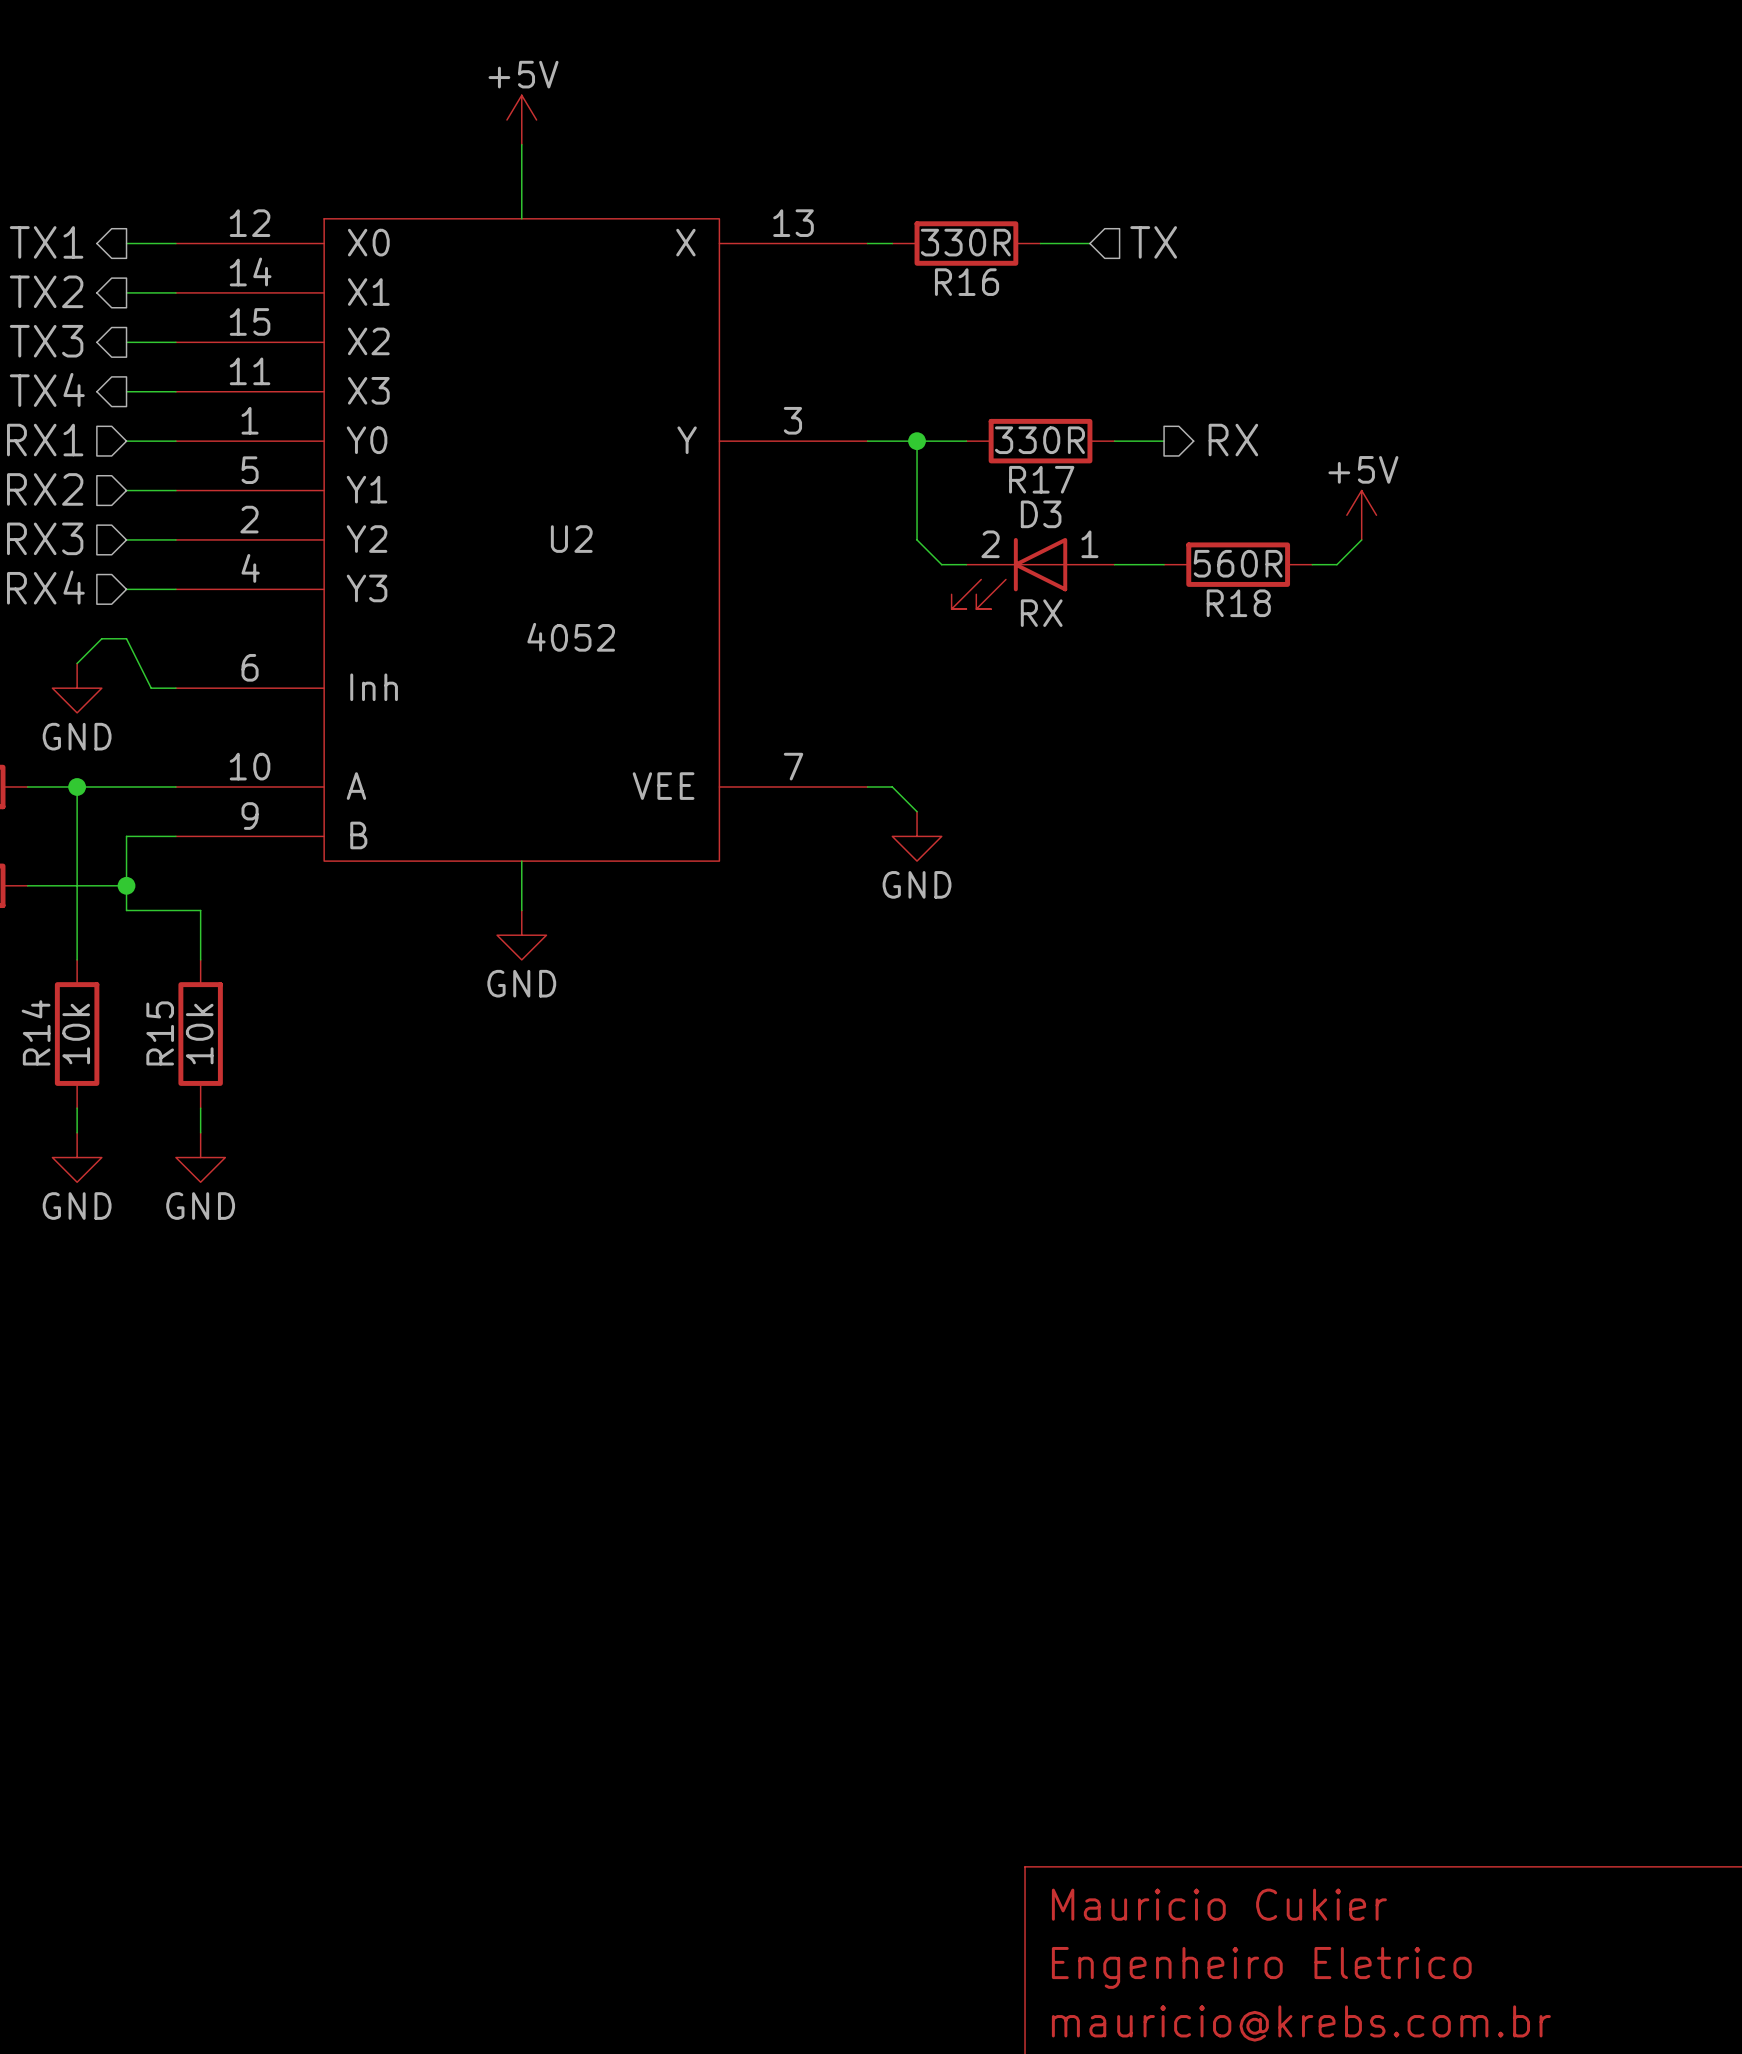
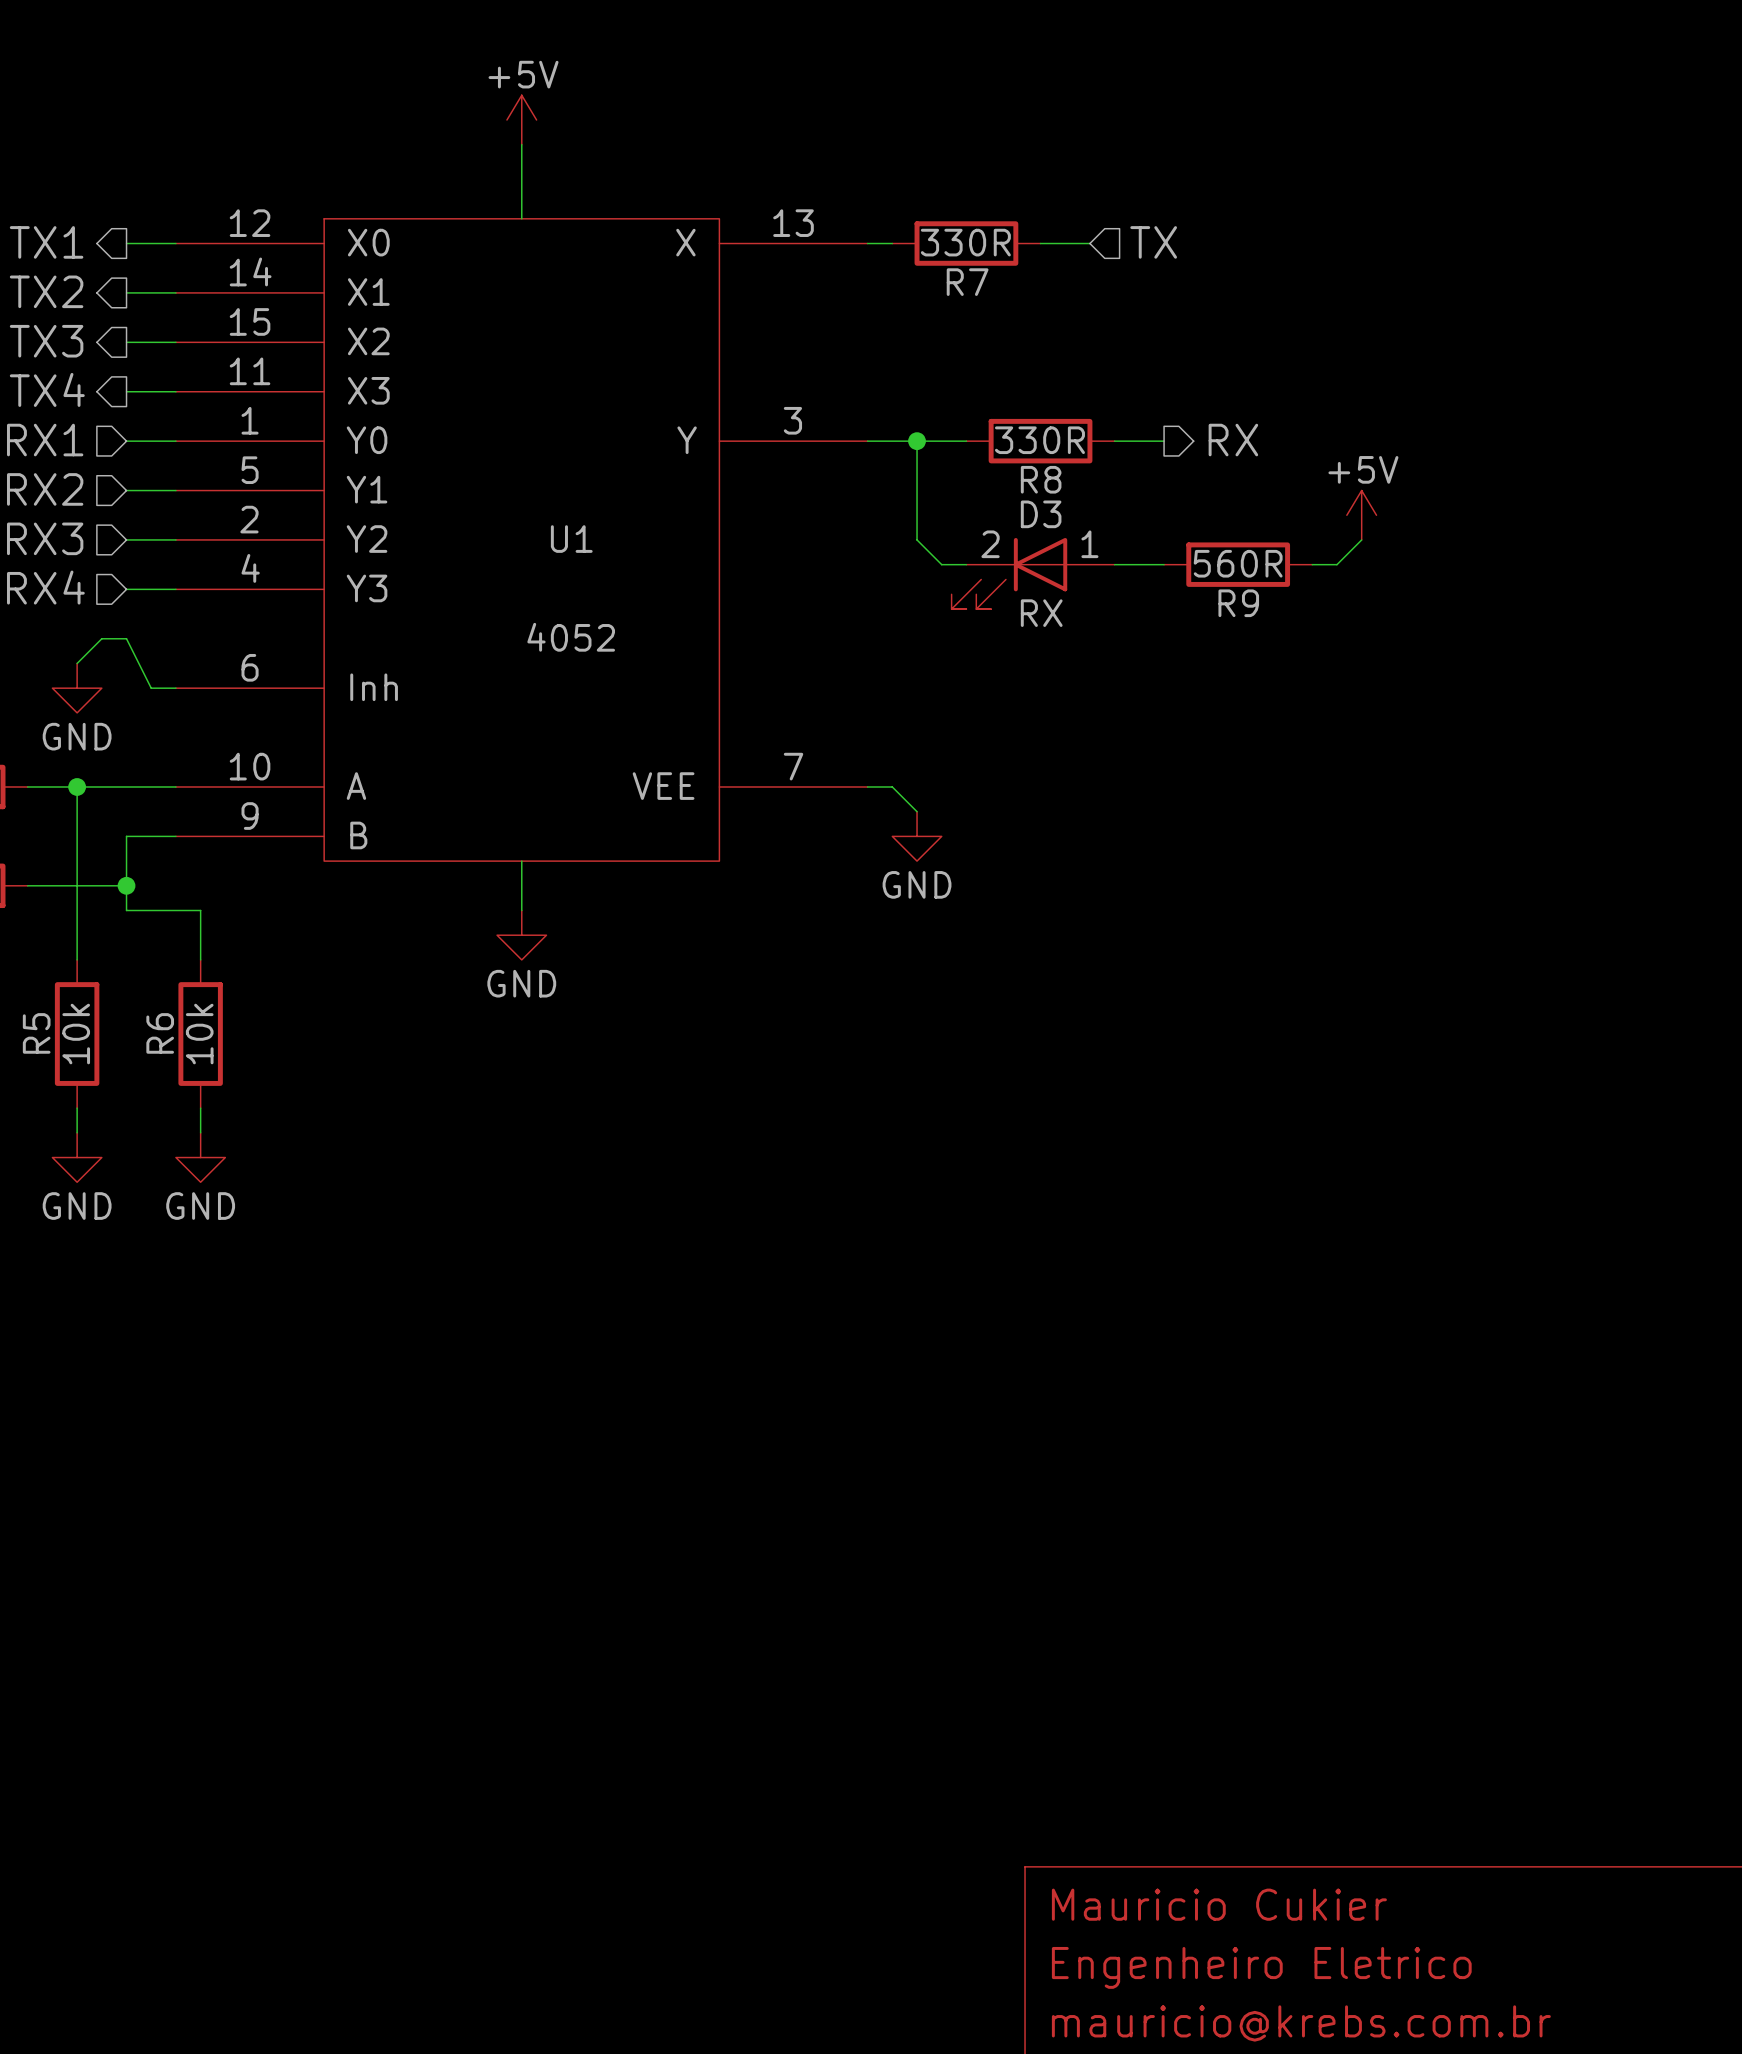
R16 name: R16 (967, 282) -> R7 (967, 282)
R17 name: R17 (1041, 479) -> R8 (1041, 479)
U2 name: U2 (571, 539) -> U1 (571, 539)
R18 name: R18 (1238, 603) -> R9 (1238, 603)
R14 name: R14 (36, 1032) -> R5 (36, 1033)
R15 name: R15 (160, 1033) -> R6 (160, 1033)

